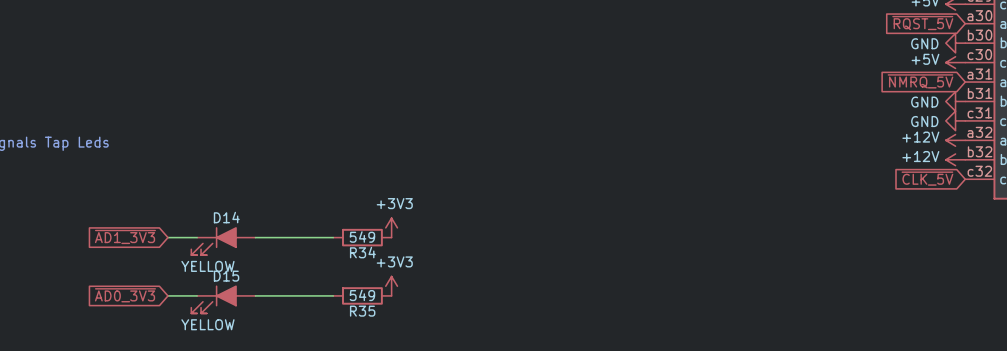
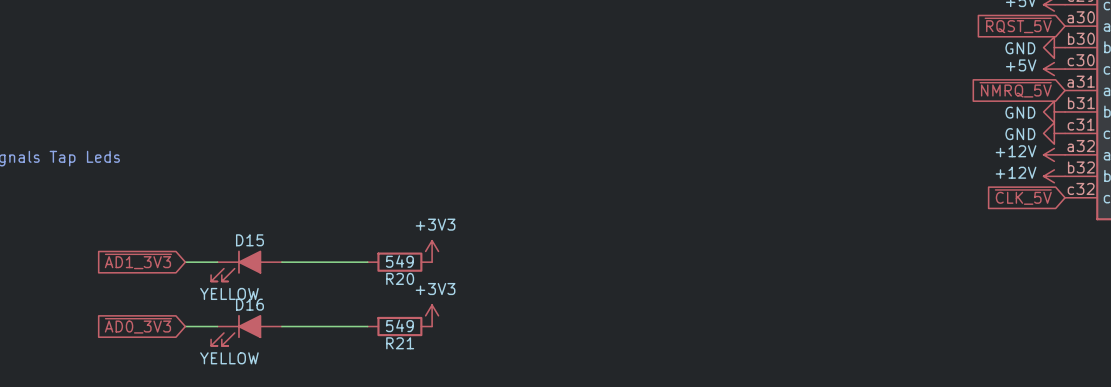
D14 name: D14 (226, 217) -> D15 (249, 240)
R34 name: R34 (362, 252) -> R20 (400, 278)
D15 name: D15 (226, 276) -> D16 (249, 304)
R35 name: R35 (362, 311) -> R21 (400, 343)

